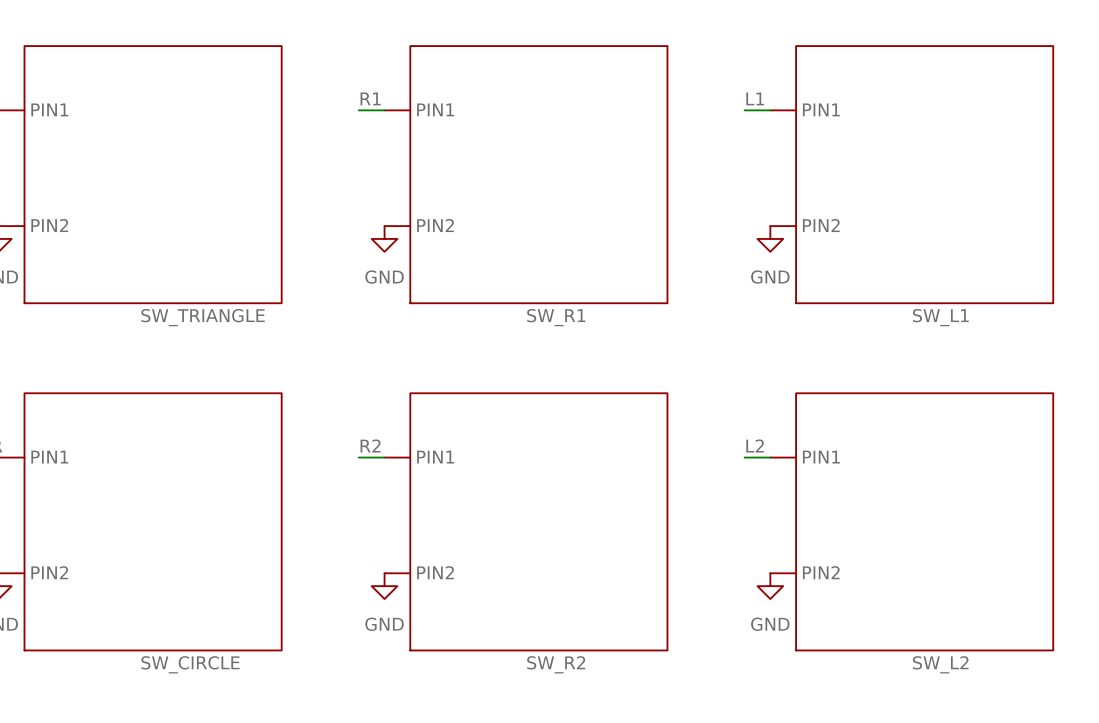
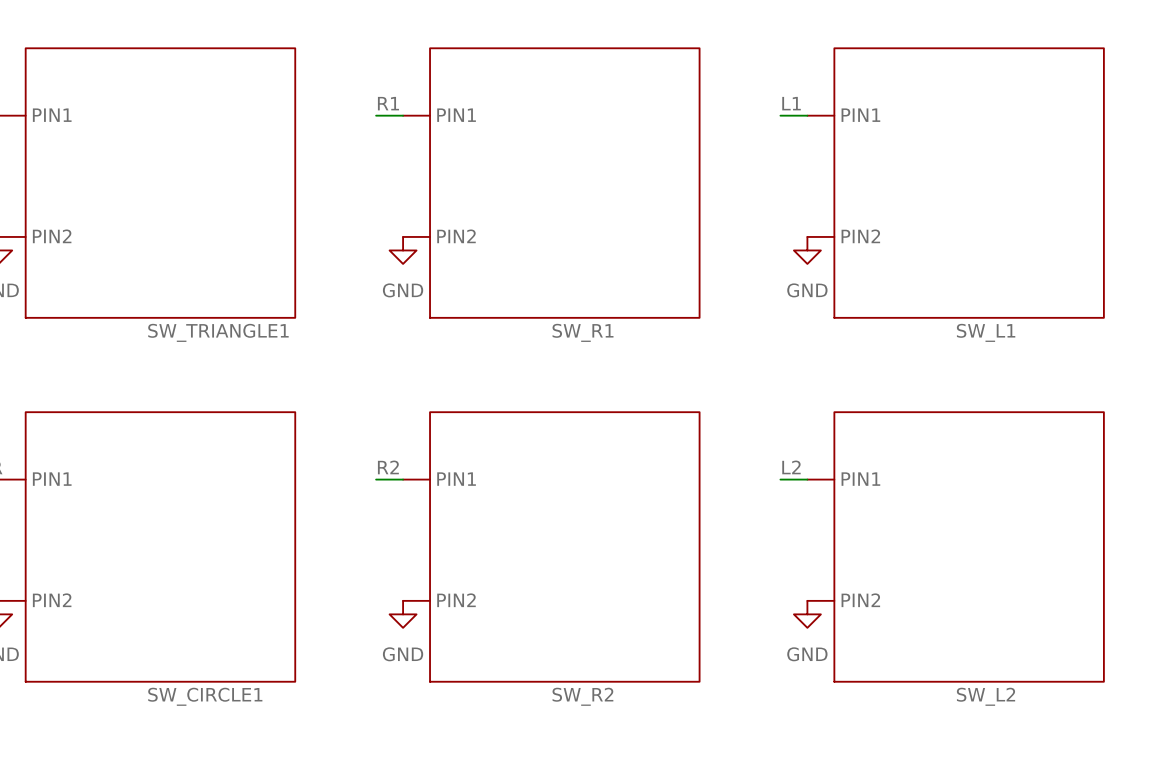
SW_TRIANGLE name: SW_TRIANGLE (203, 317) -> SW_TRIANGLE1 (218, 332)
SW_CIRCLE name: SW_CIRCLE (190, 664) -> SW_CIRCLE1 (205, 696)

